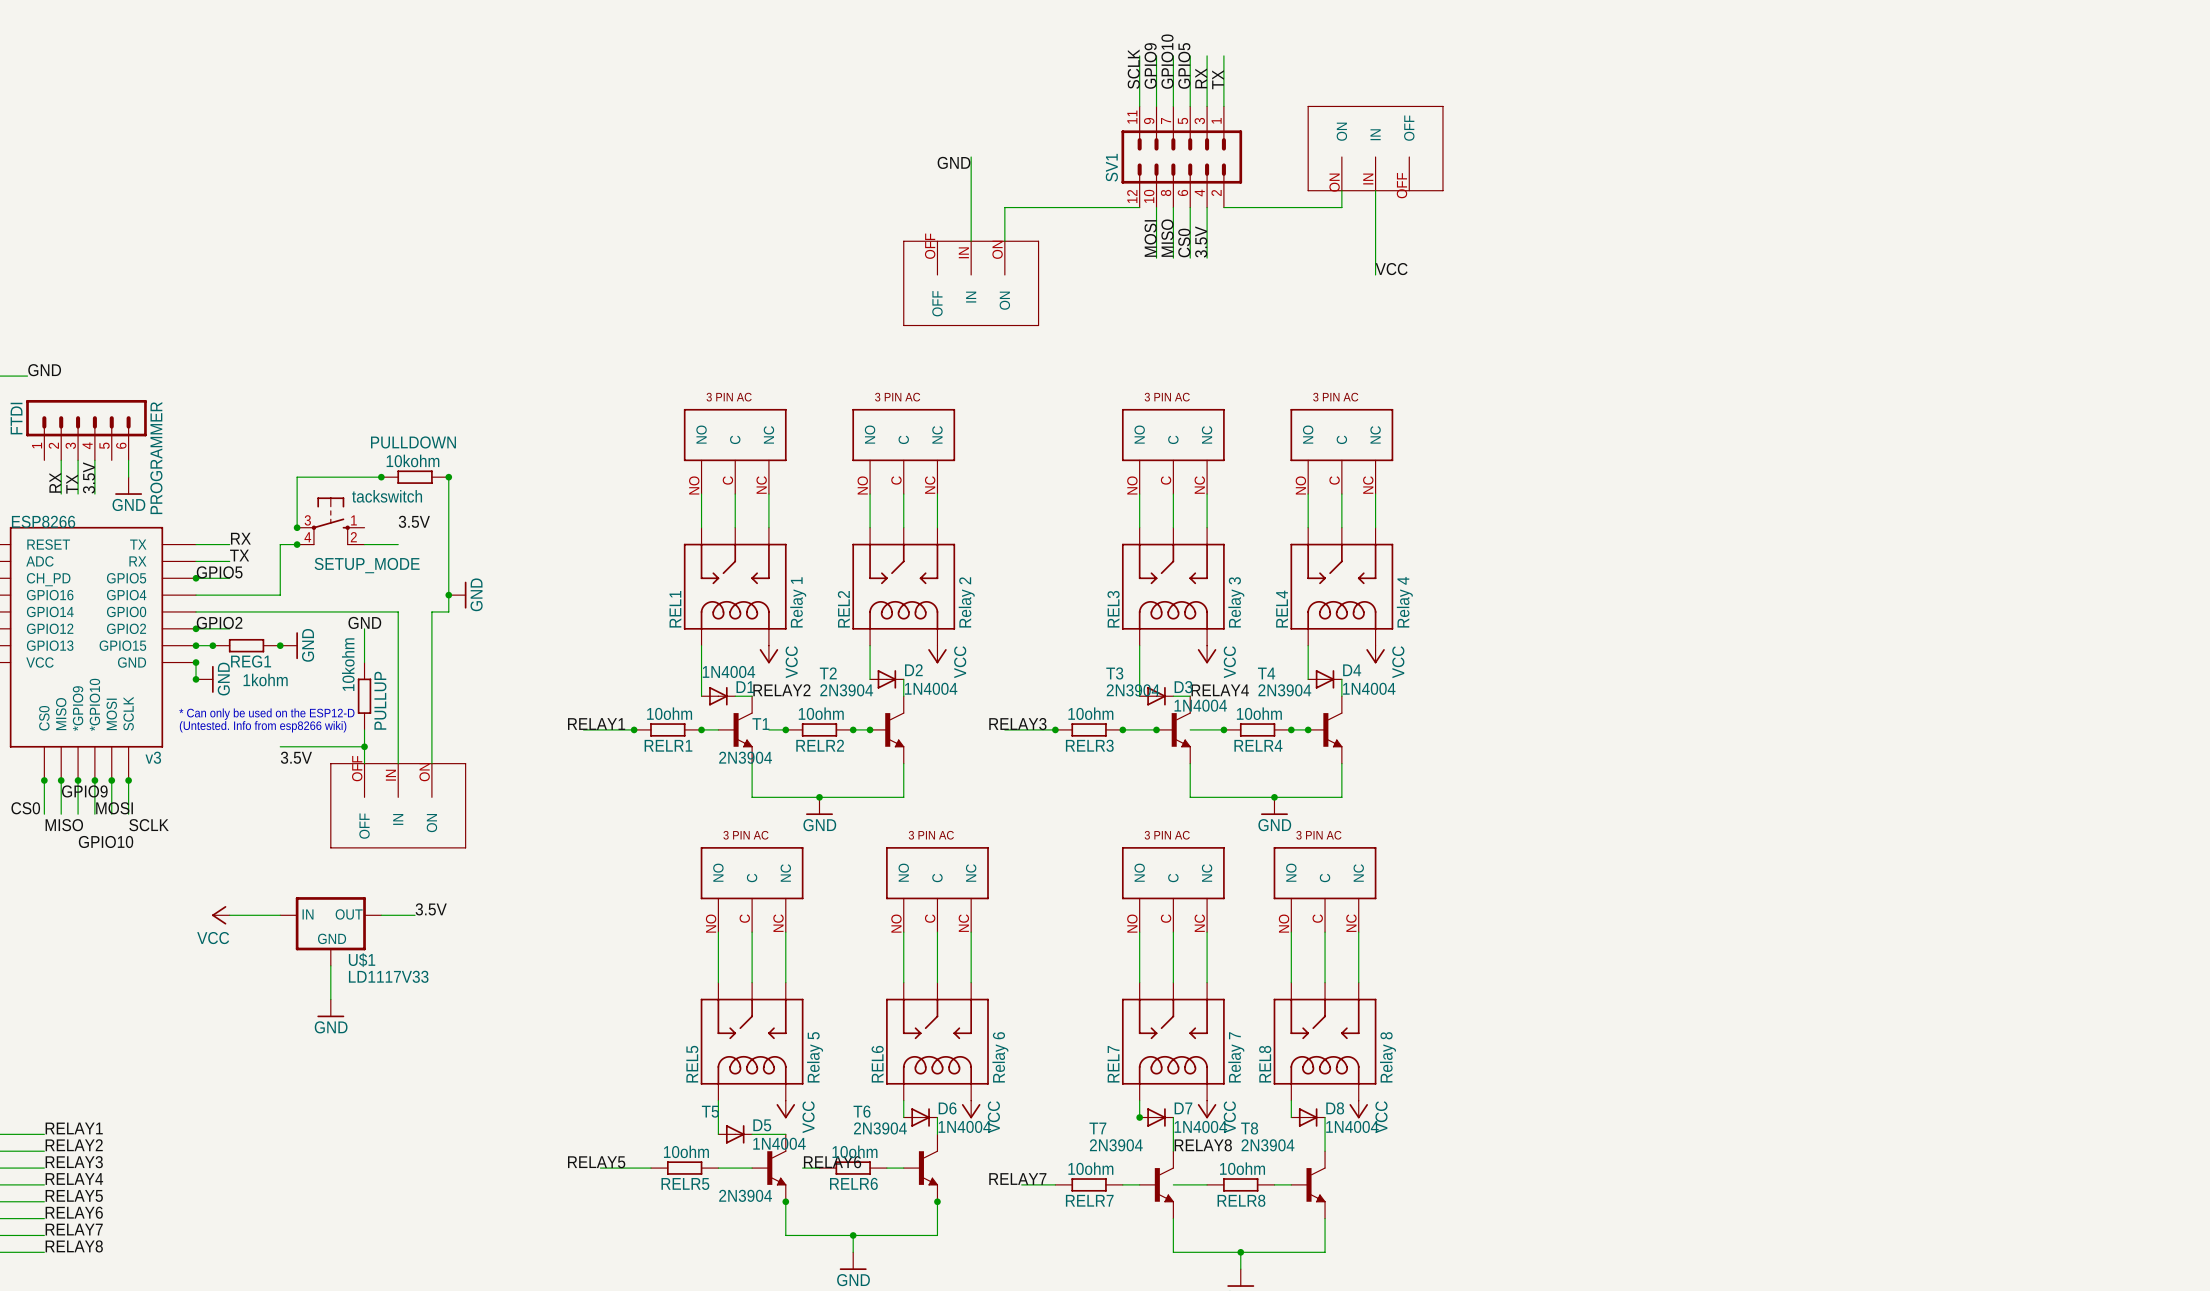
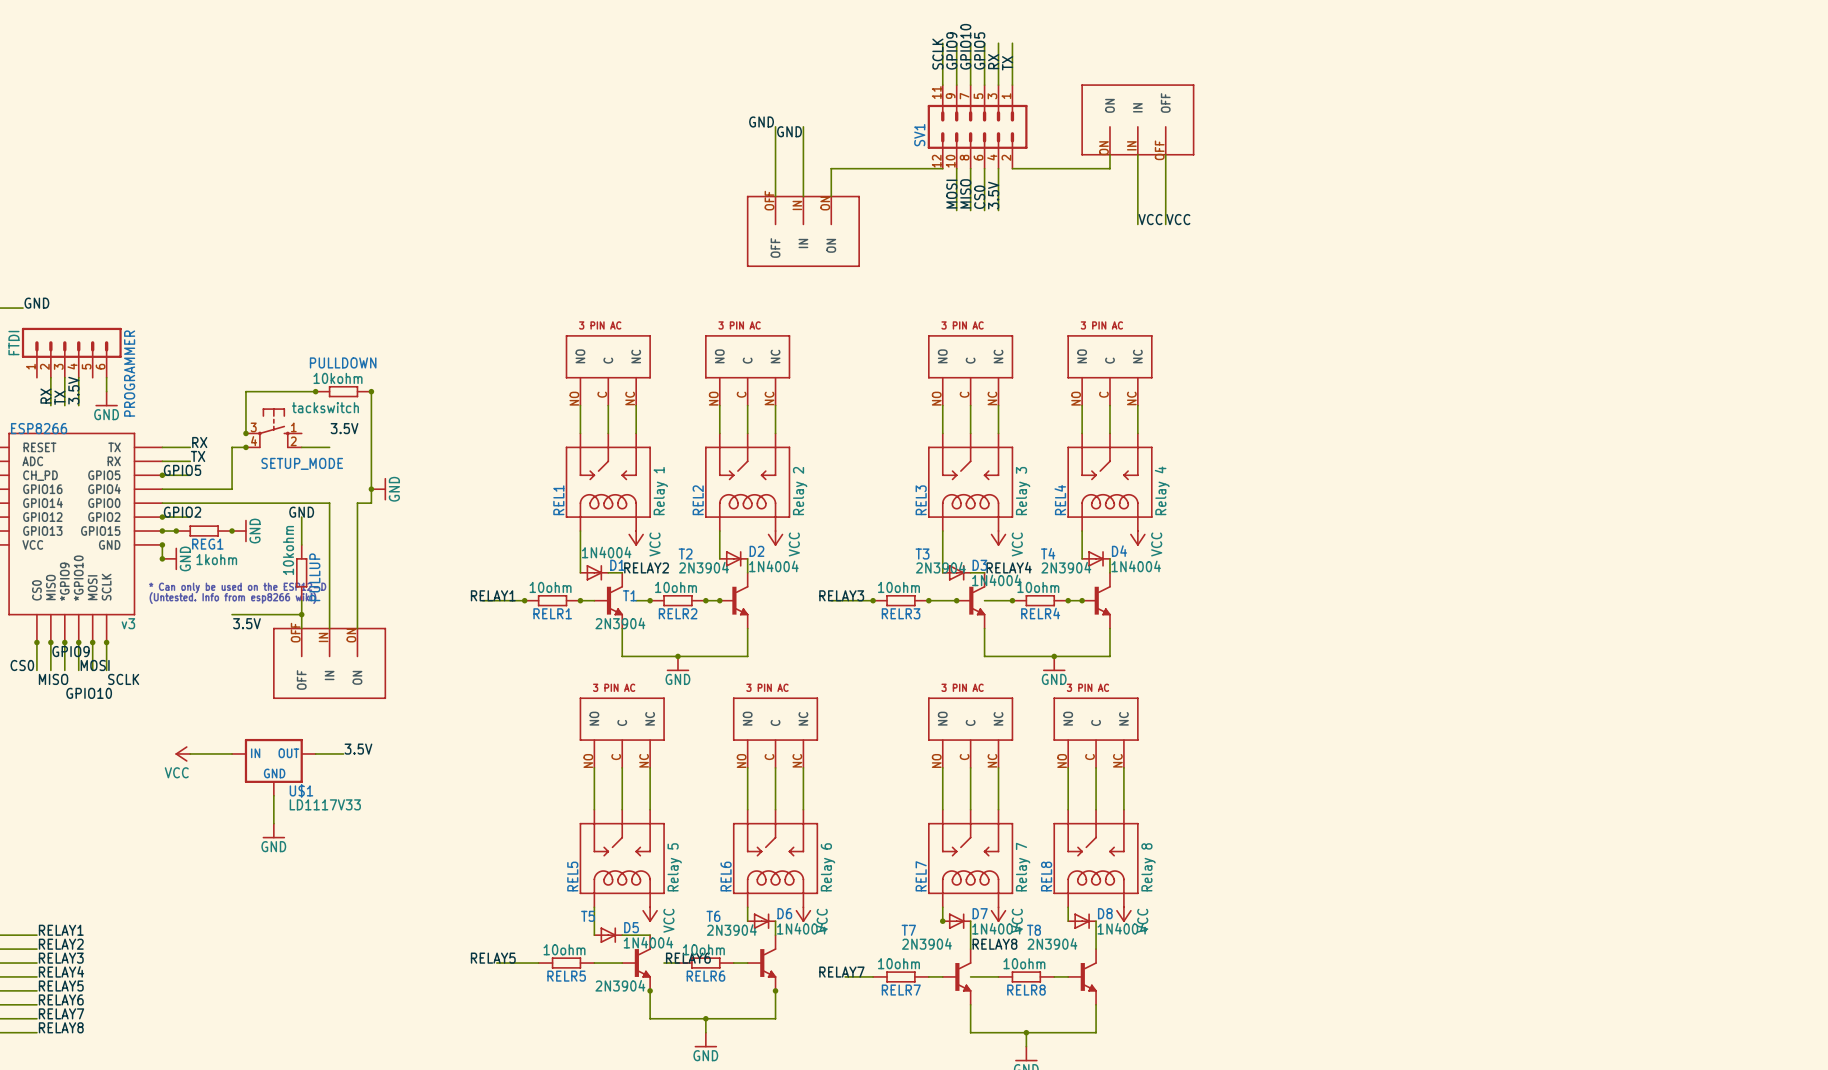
label: none -> GND (761, 122)
wire: none -> (775, 126) (775, 196)
wire: none -> (1165, 154) (1165, 224)
label: none -> VCC (1178, 219)

